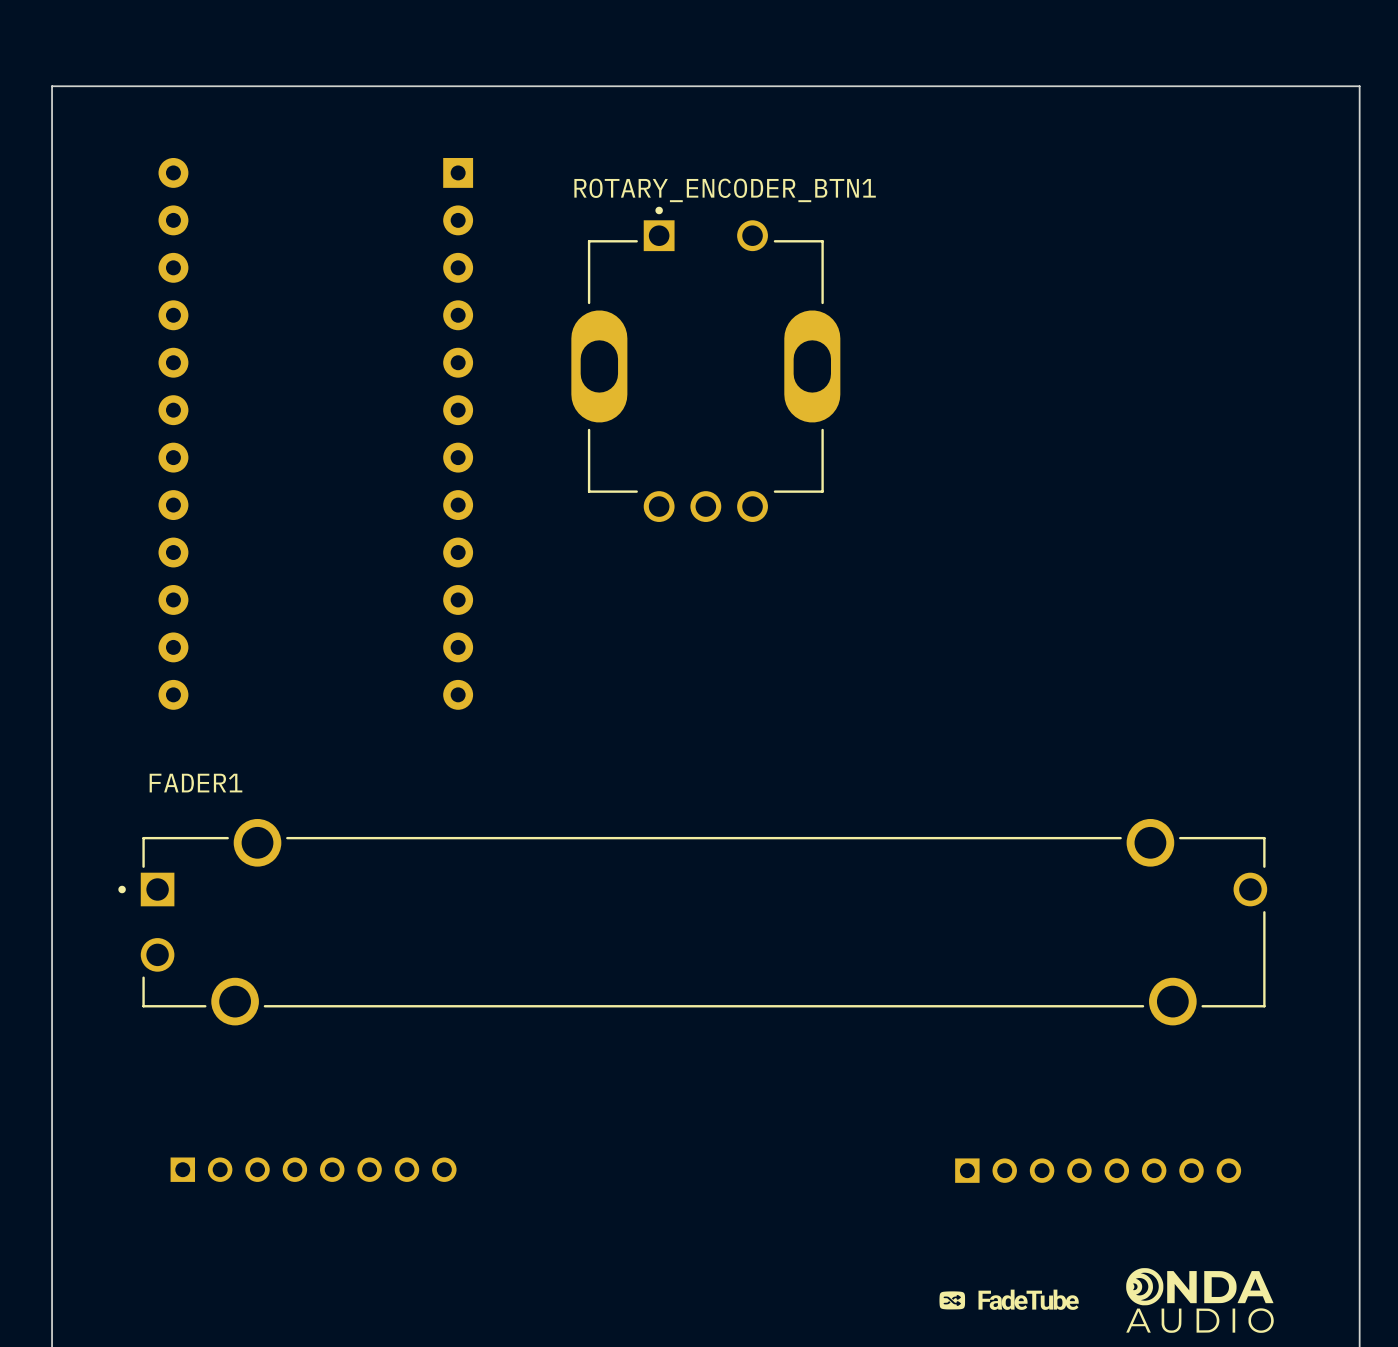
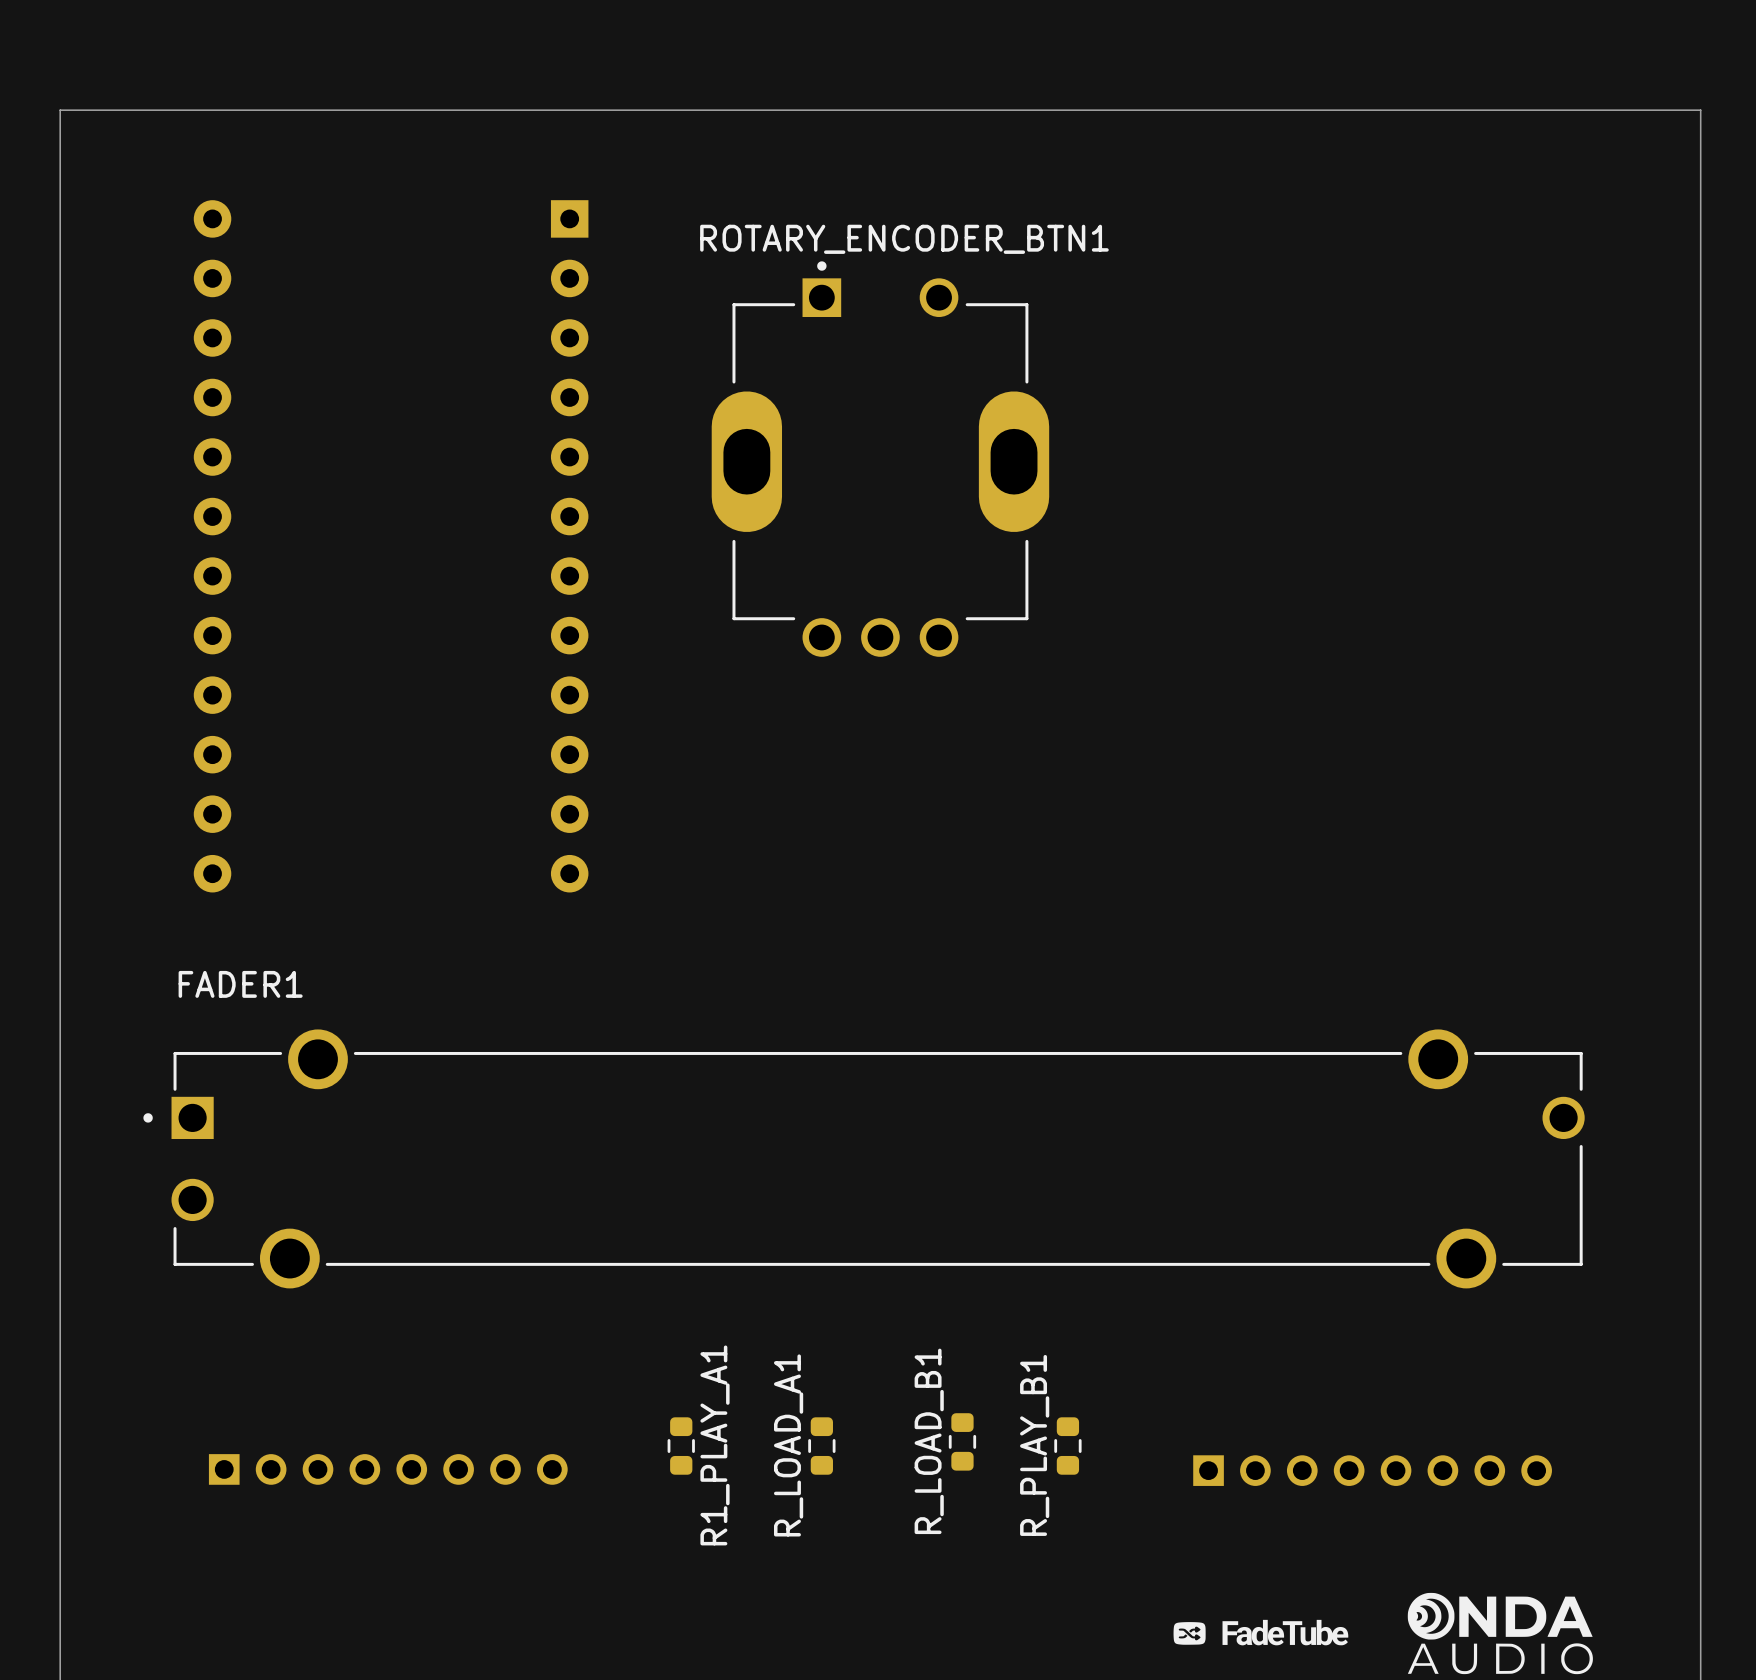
R_LOAD_B1: none -> (962, 1441)
R1_PLAY_A1: none -> (681, 1446)
R_LOAD_A1: none -> (821, 1446)
R_PLAY_B1: none -> (1067, 1446)

